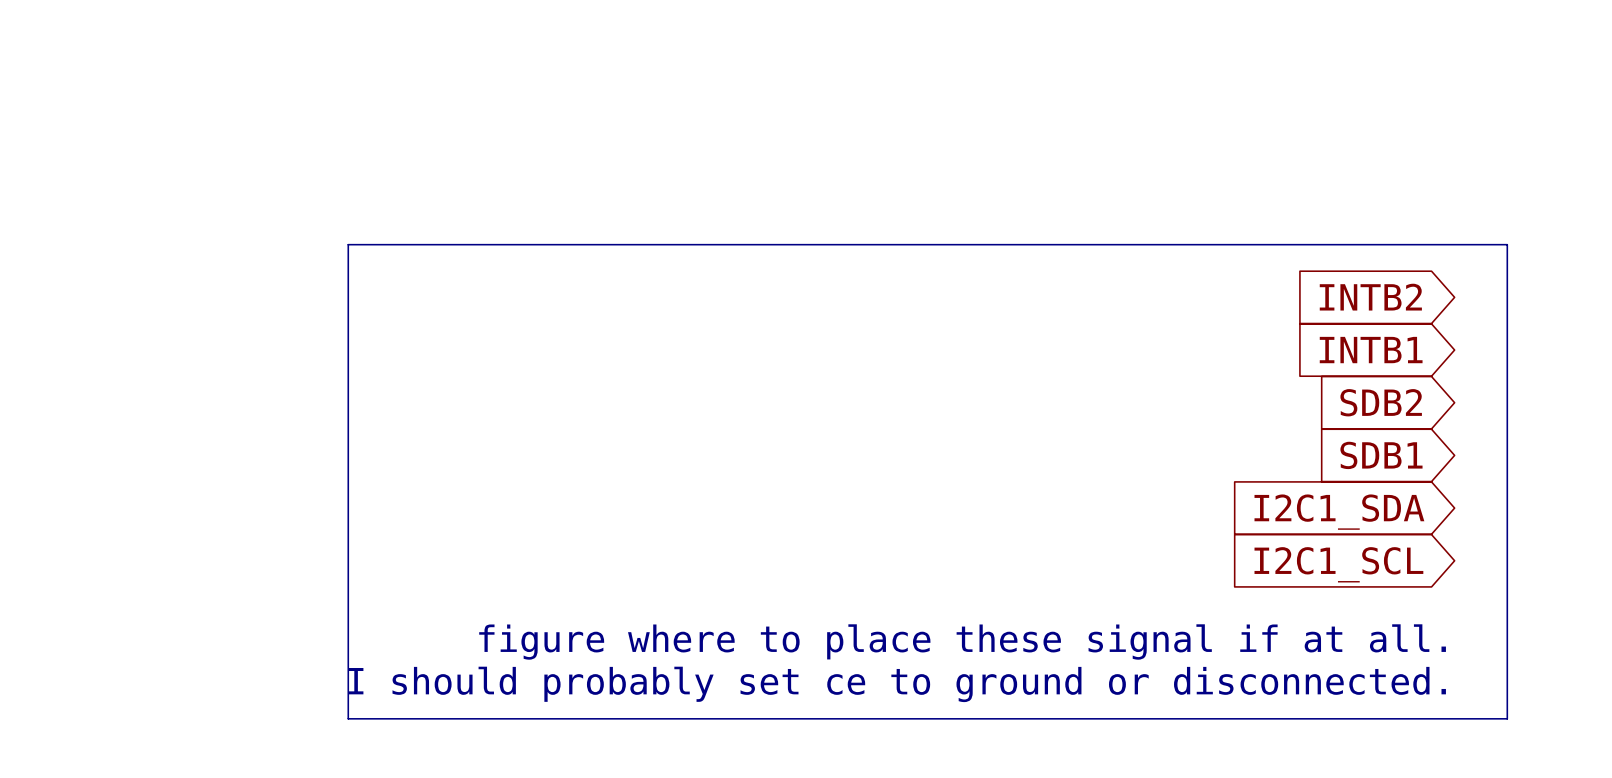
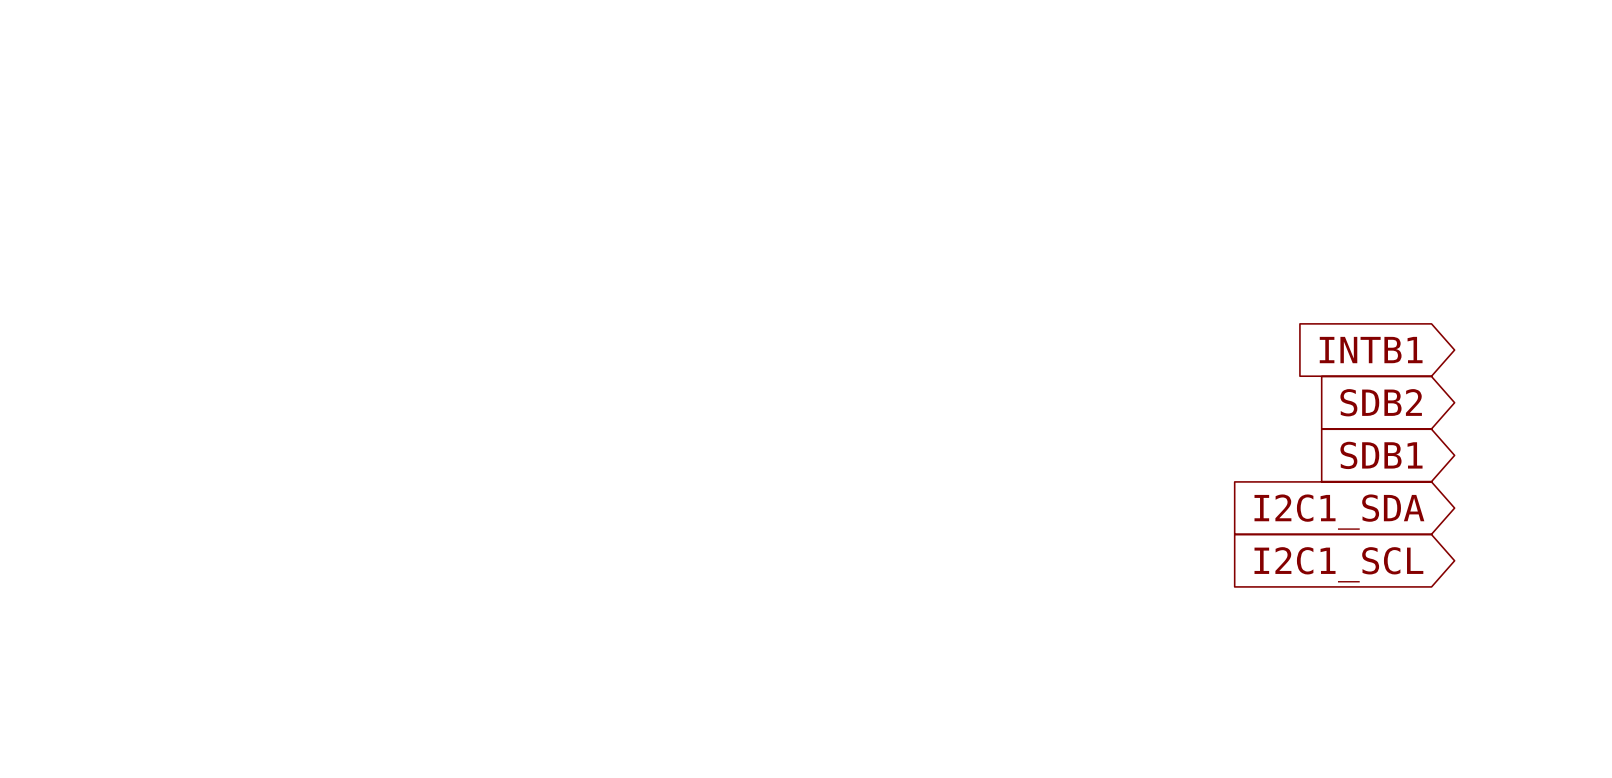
line: (348, 244) (1507, 244) (1507, 718) (348, 718) (348, 244) -> none
global label: INTB2 (1370, 297) -> none
text: figure where to place these signal if at all. (962, 641) -> none
text: I should probably set ce to ground or disconnected. (897, 684) -> none

